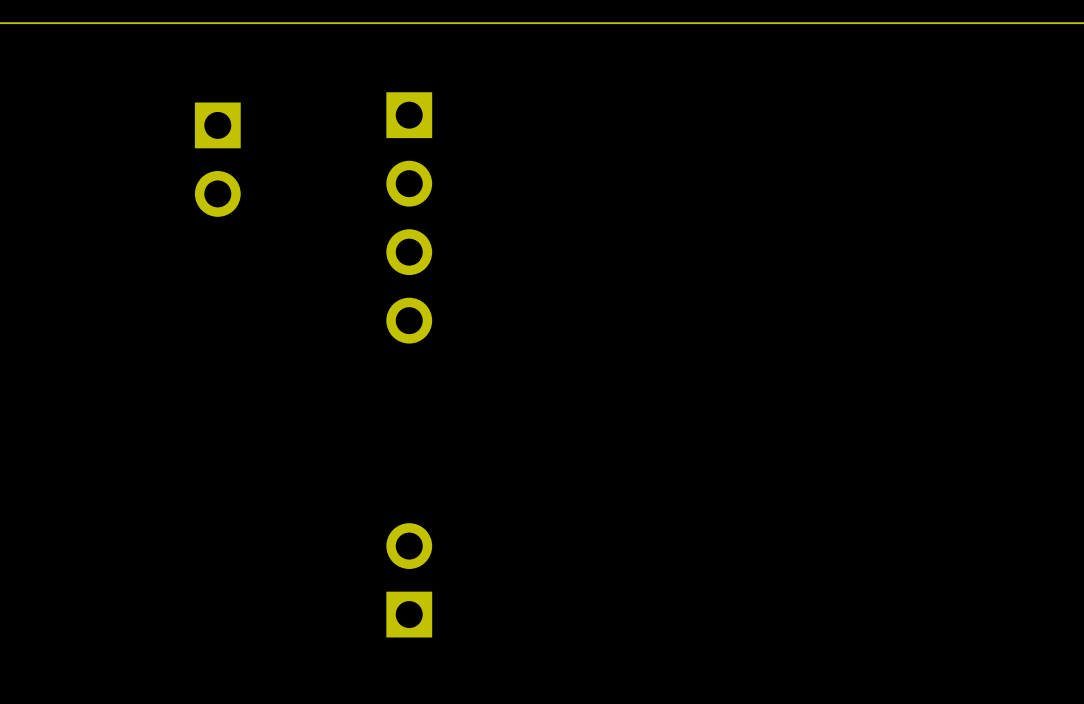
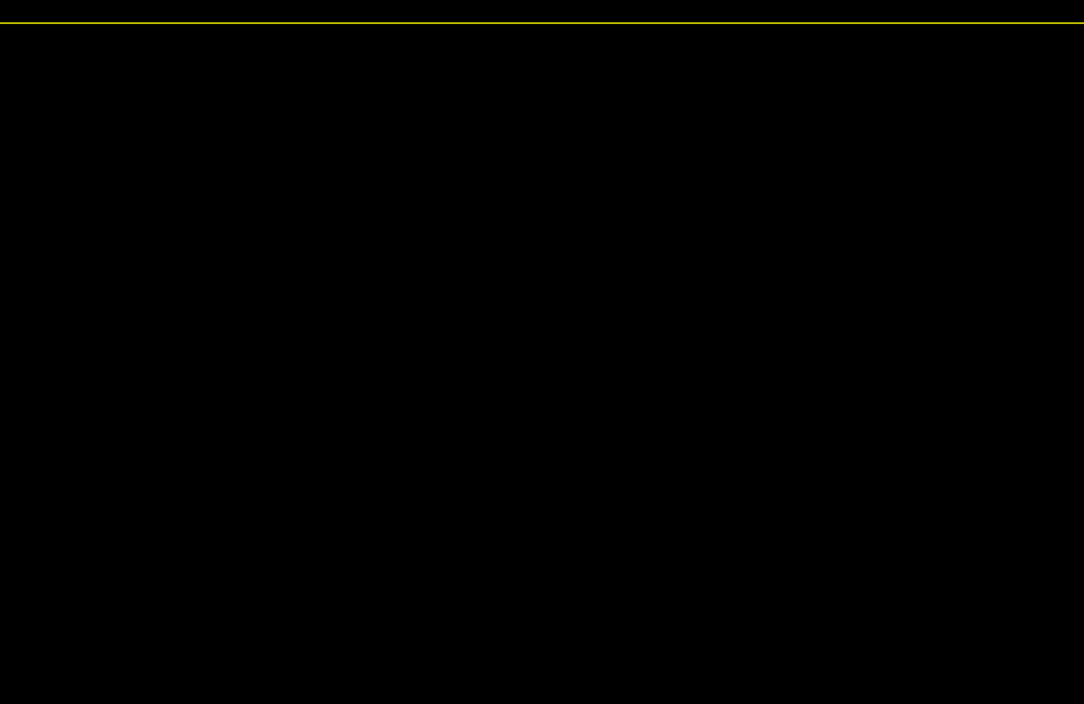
part: (217, 159) -> none
part: (409, 217) -> none
part: (409, 580) -> none

